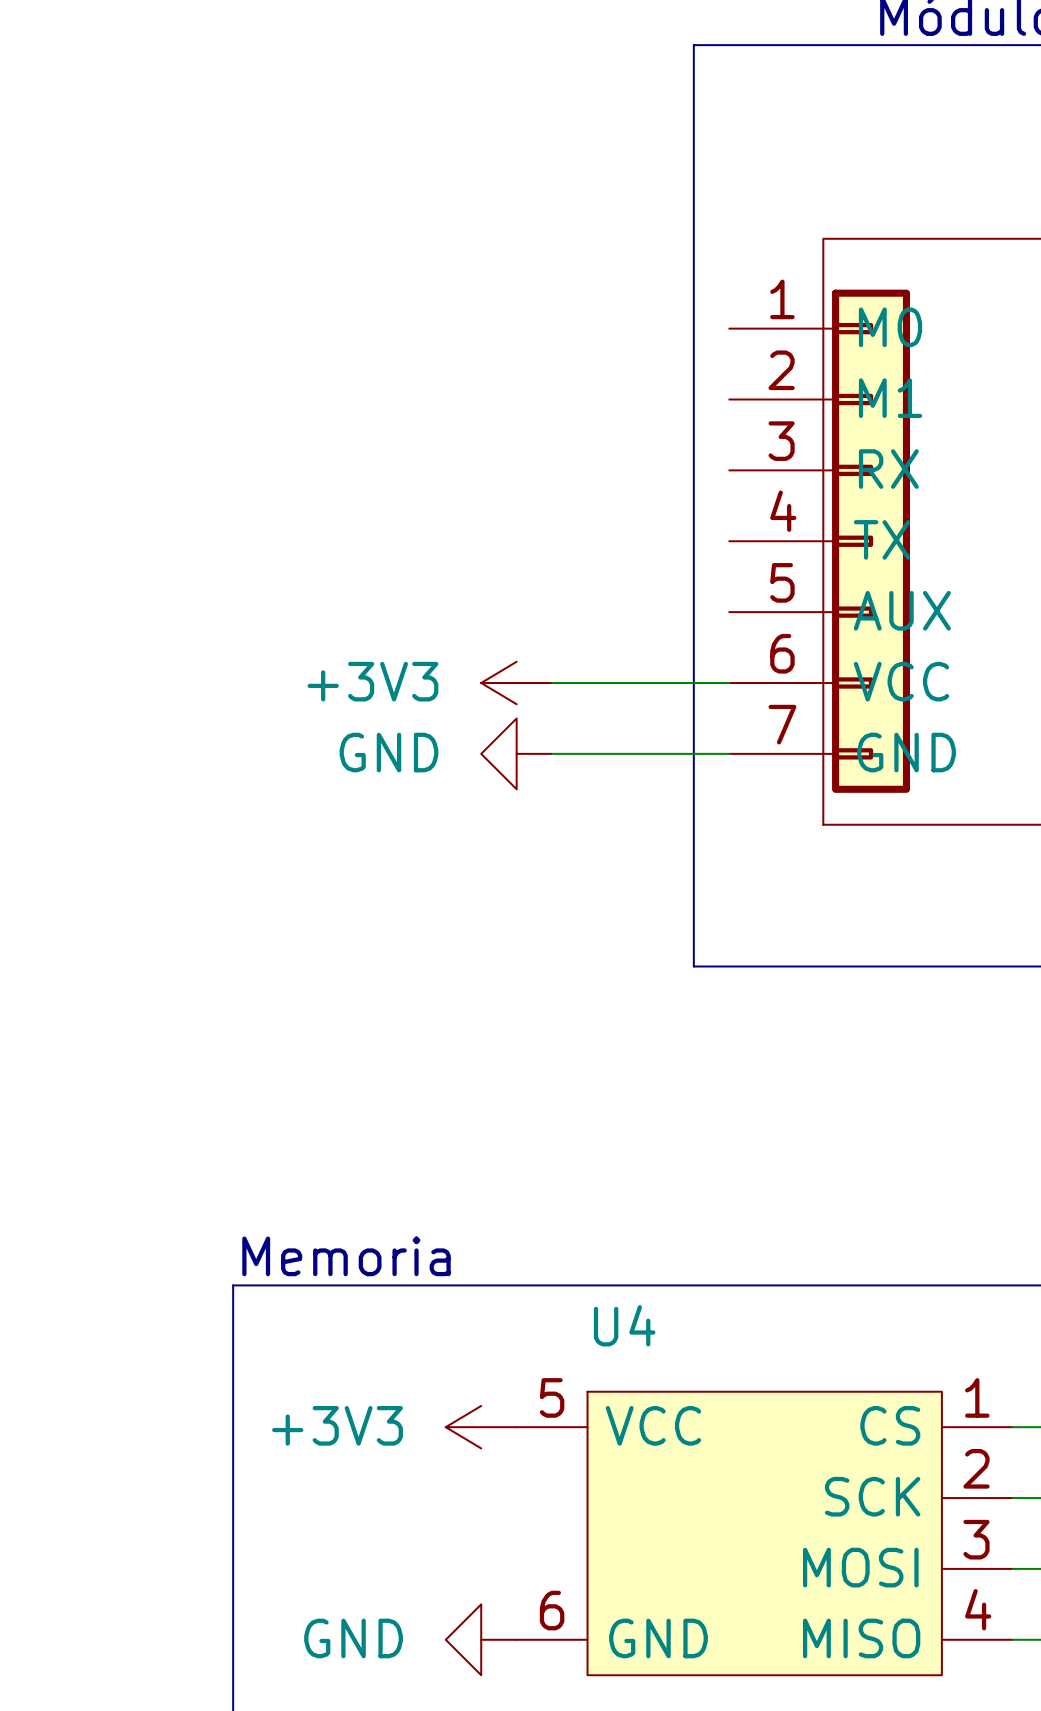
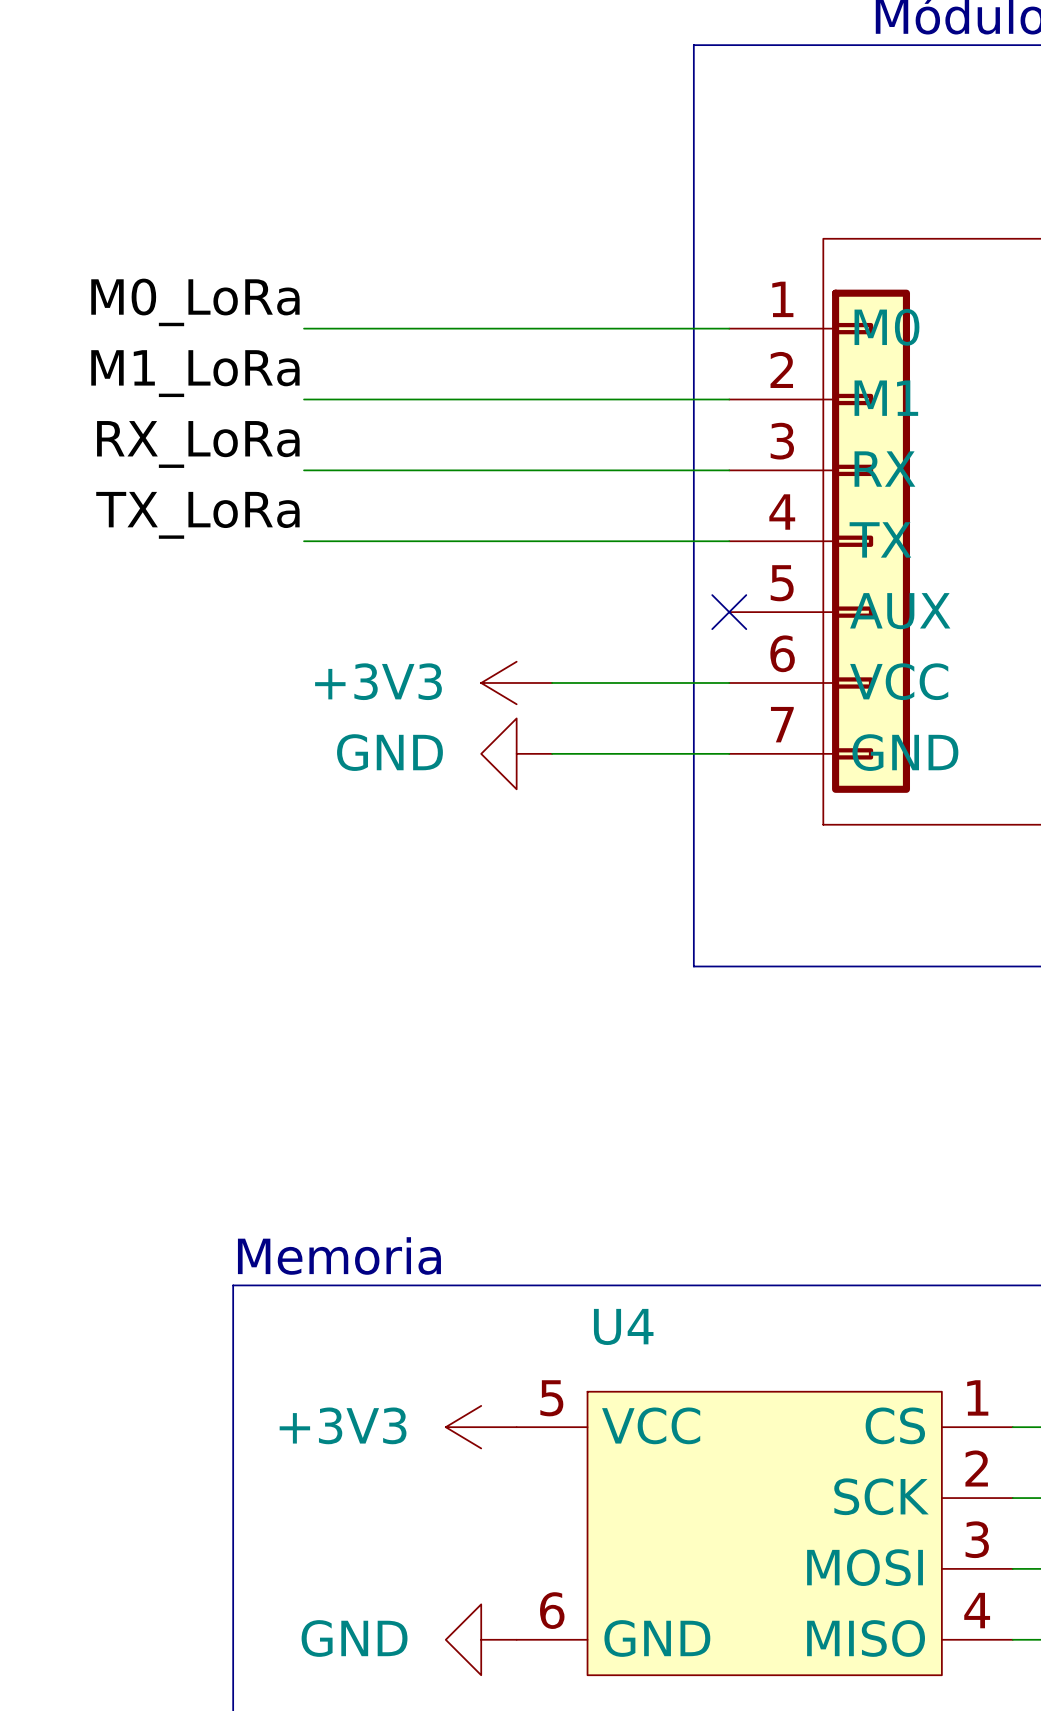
label: none -> M0_LoRa (195, 302)
wire: none -> (304, 328) (729, 328)
label: none -> M1_LoRa (195, 373)
wire: none -> (304, 399) (729, 399)
label: none -> RX_LoRa (198, 444)
wire: none -> (304, 470) (729, 470)
label: none -> TX_LoRa (197, 515)
wire: none -> (304, 541) (729, 541)
no-connect mark: none -> (729, 612)

